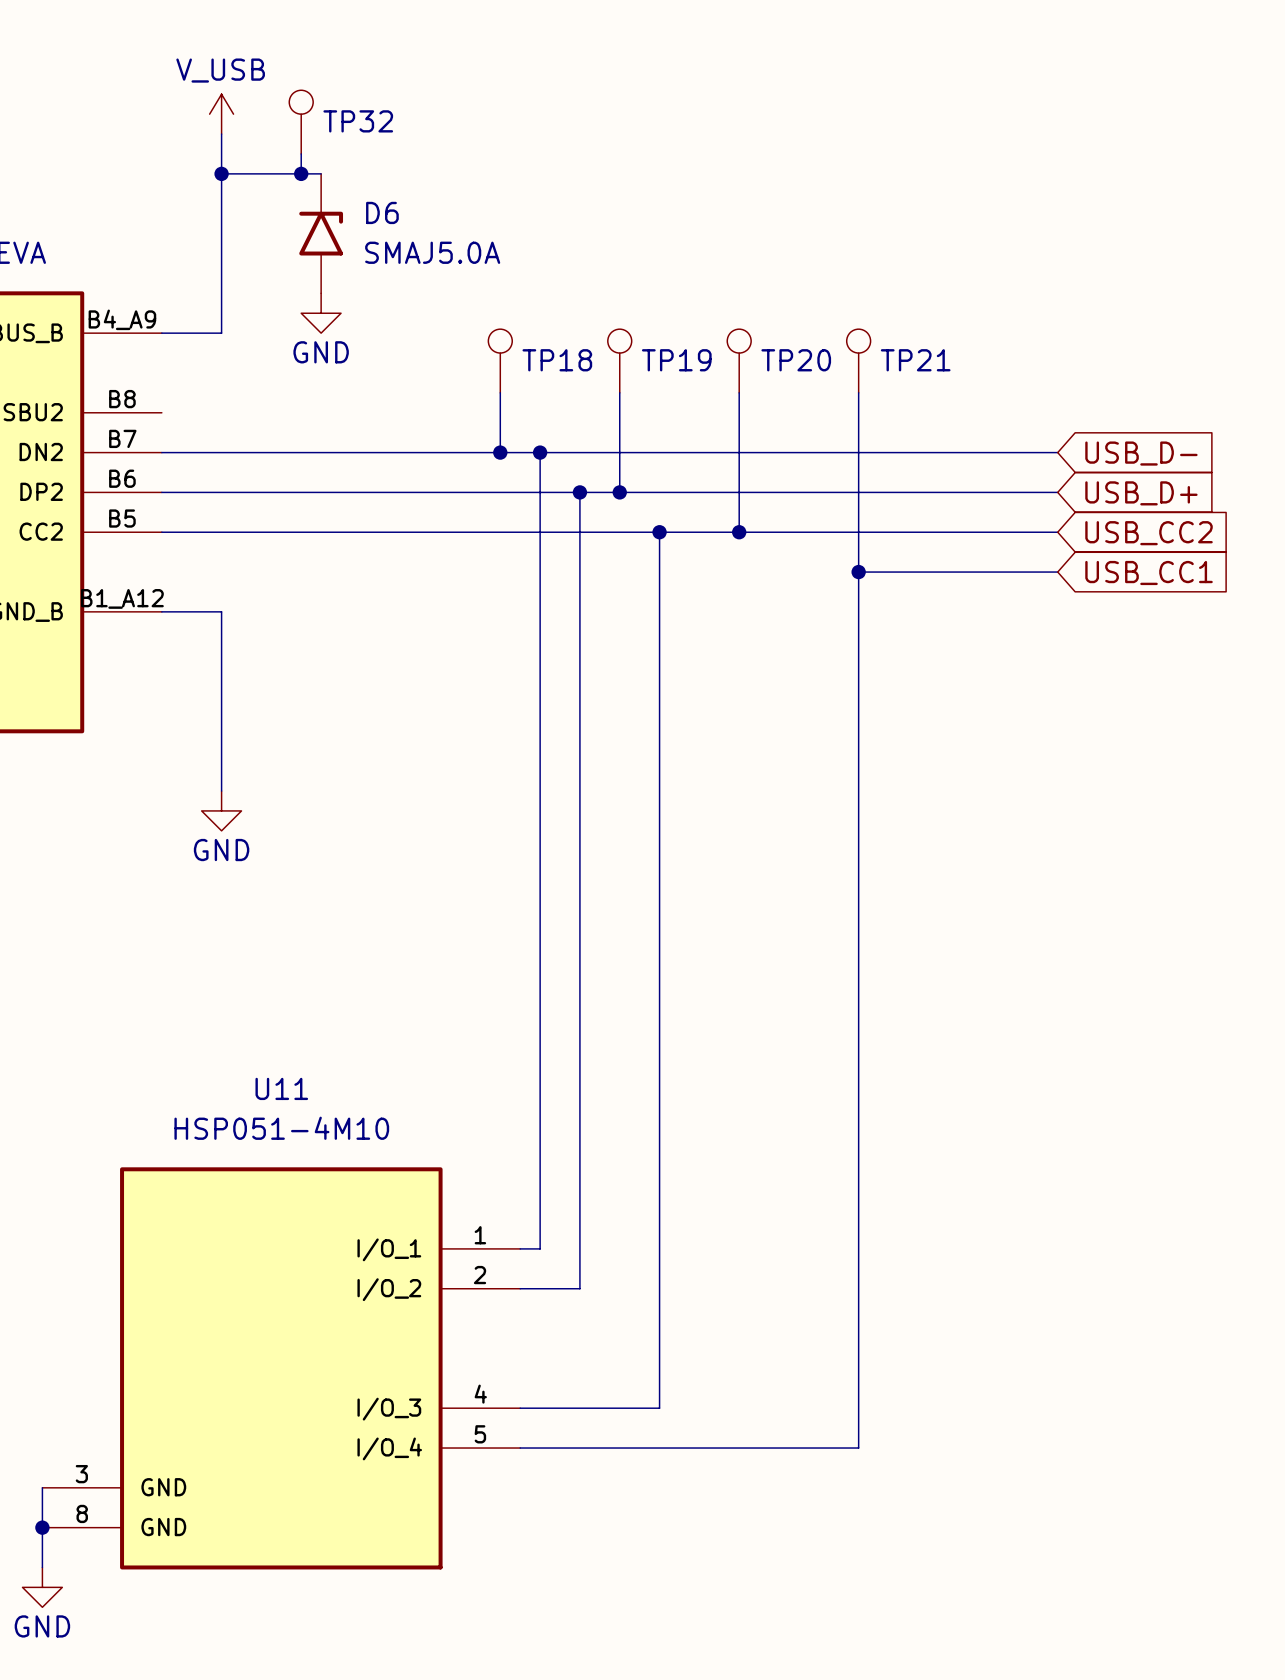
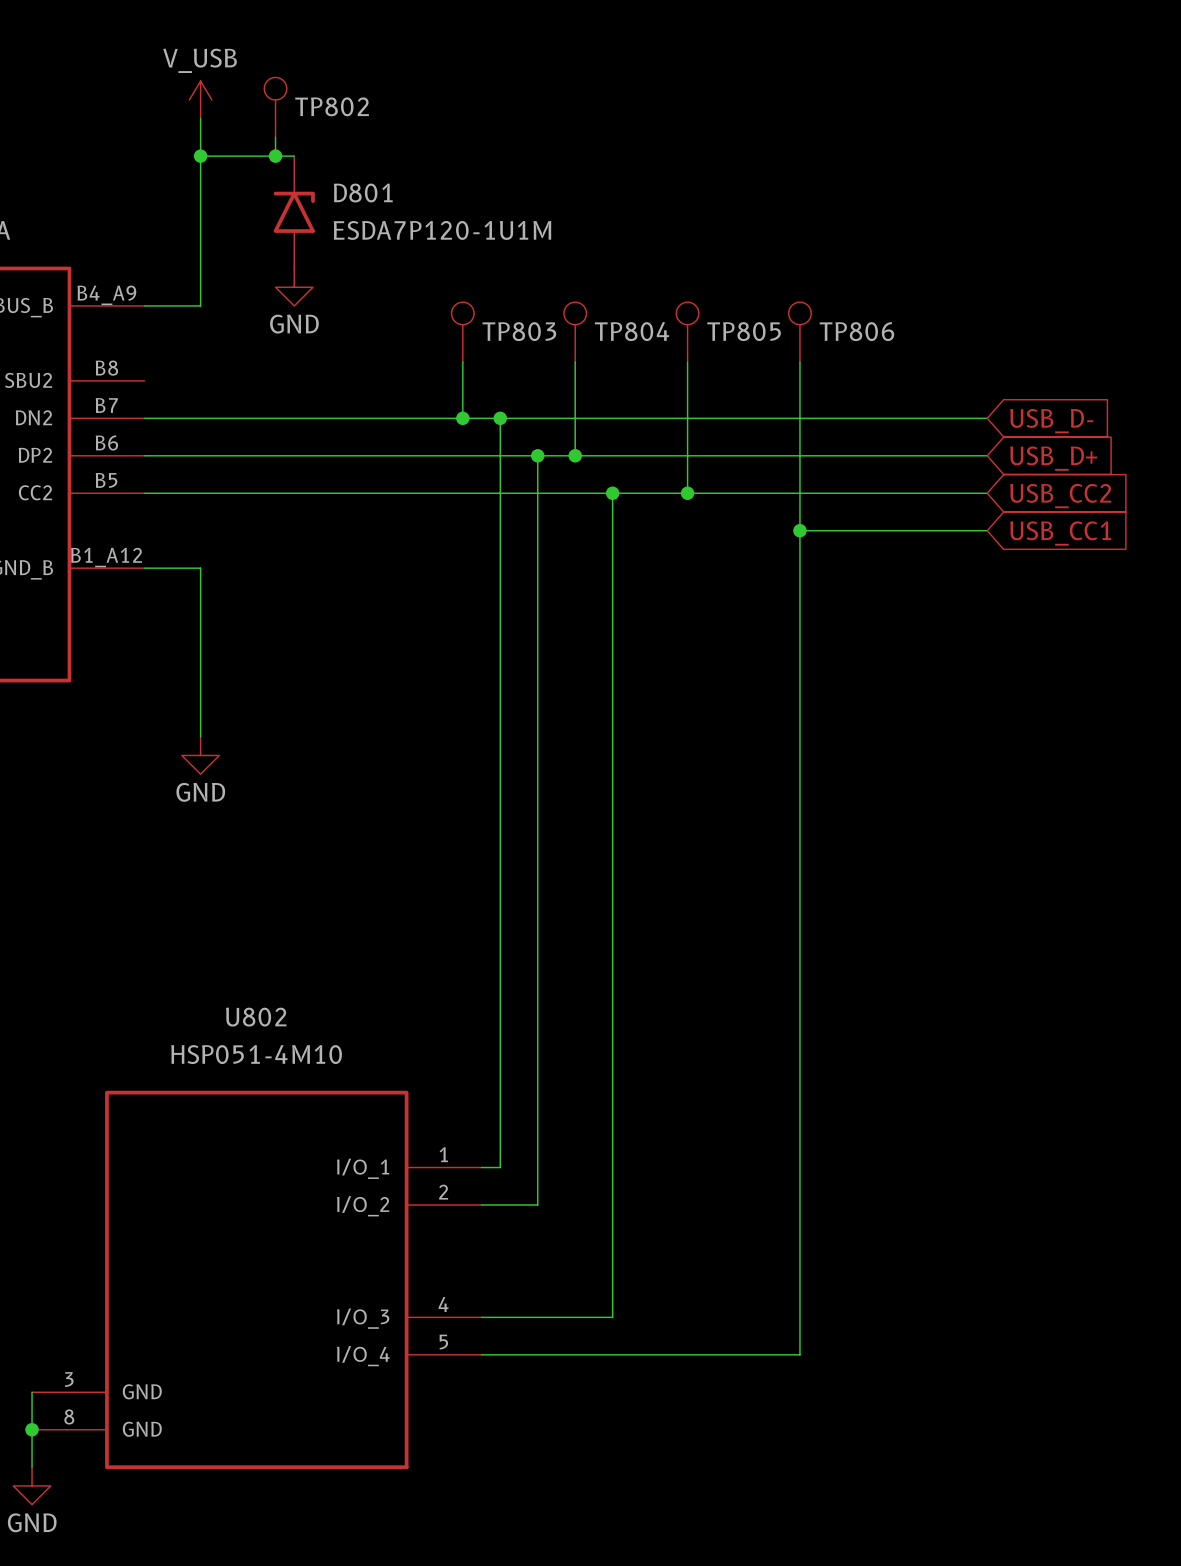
TP32 name: TP32 (358, 121) -> TP802 (332, 106)
D6 name: D6 (382, 212) -> D801 (363, 192)
D6 value: SMAJ5.0A (432, 252) -> ESDA7P120-1U1M (442, 230)
TP18 name: TP18 (557, 360) -> TP803 (519, 331)
TP19 name: TP19 (676, 360) -> TP804 (632, 331)
TP20 name: TP20 (796, 360) -> TP805 (744, 331)
TP21 name: TP21 (915, 360) -> TP806 (856, 331)
U11 name: U11 (281, 1088) -> U802 (256, 1017)

